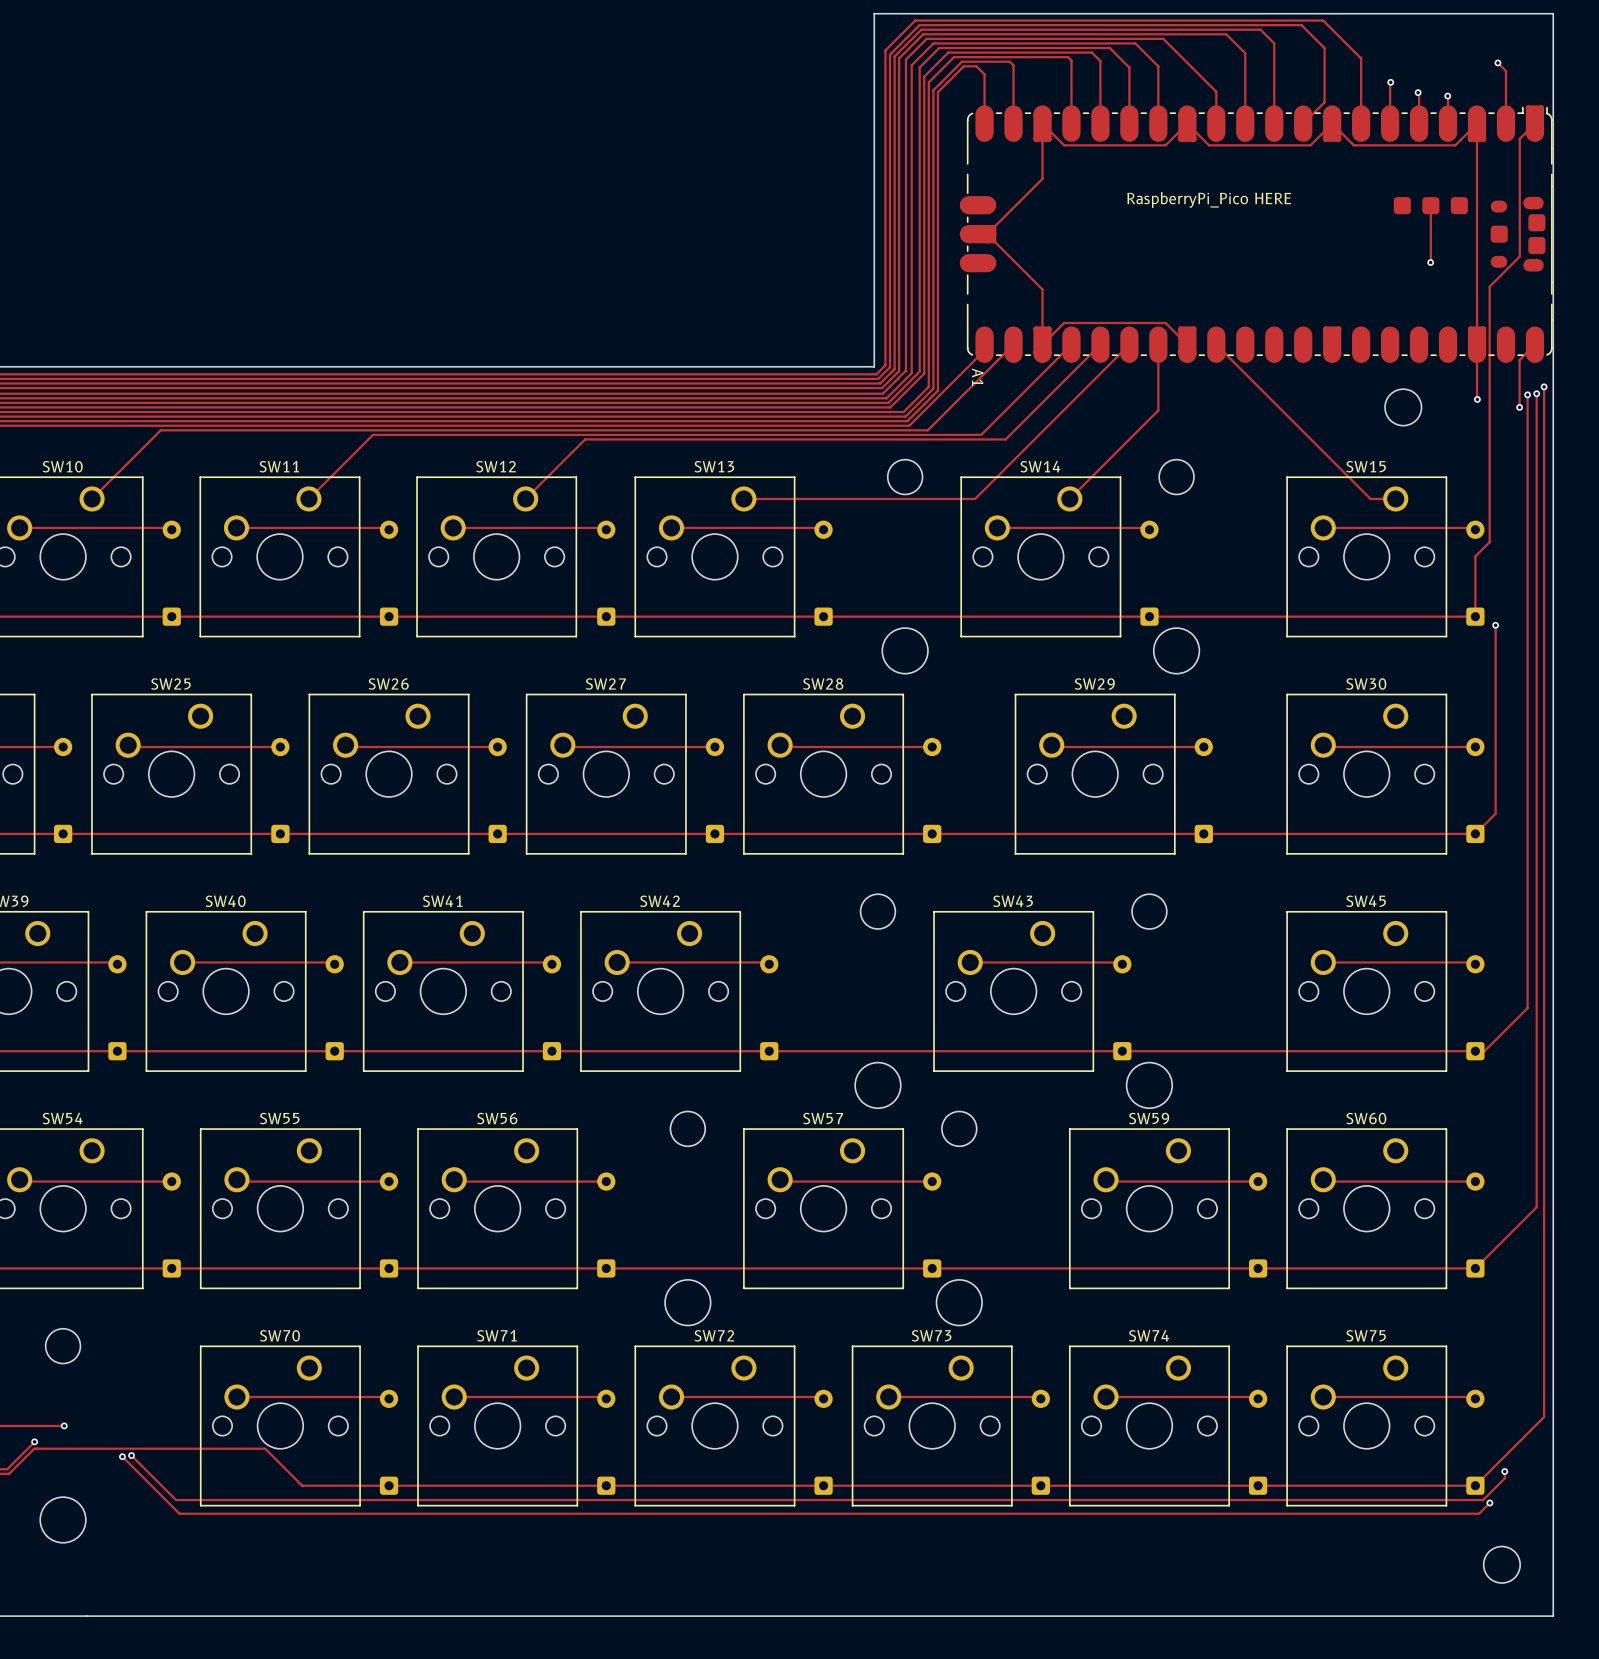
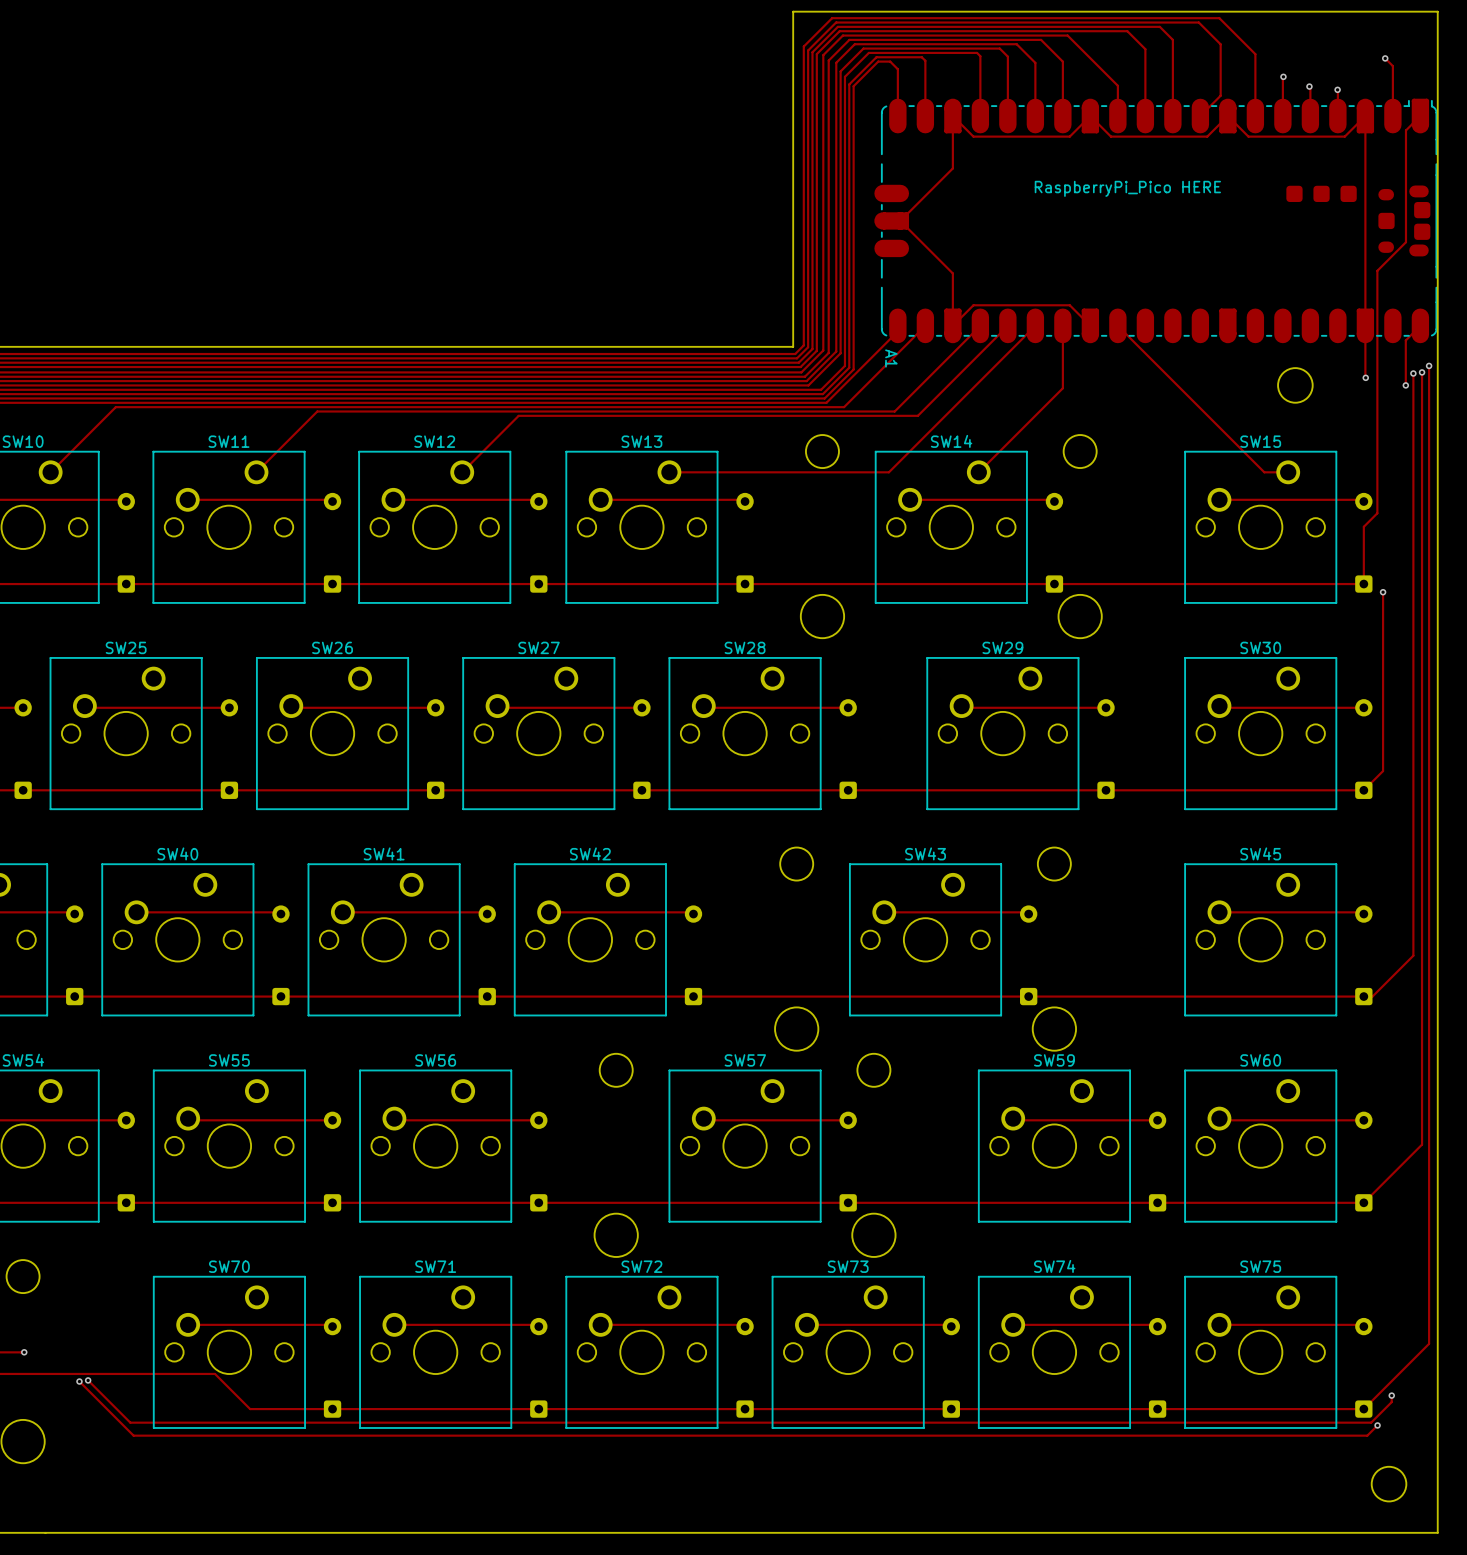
track: (1430, 205) (1430, 262) -> none
via: (1430, 262) -> none

